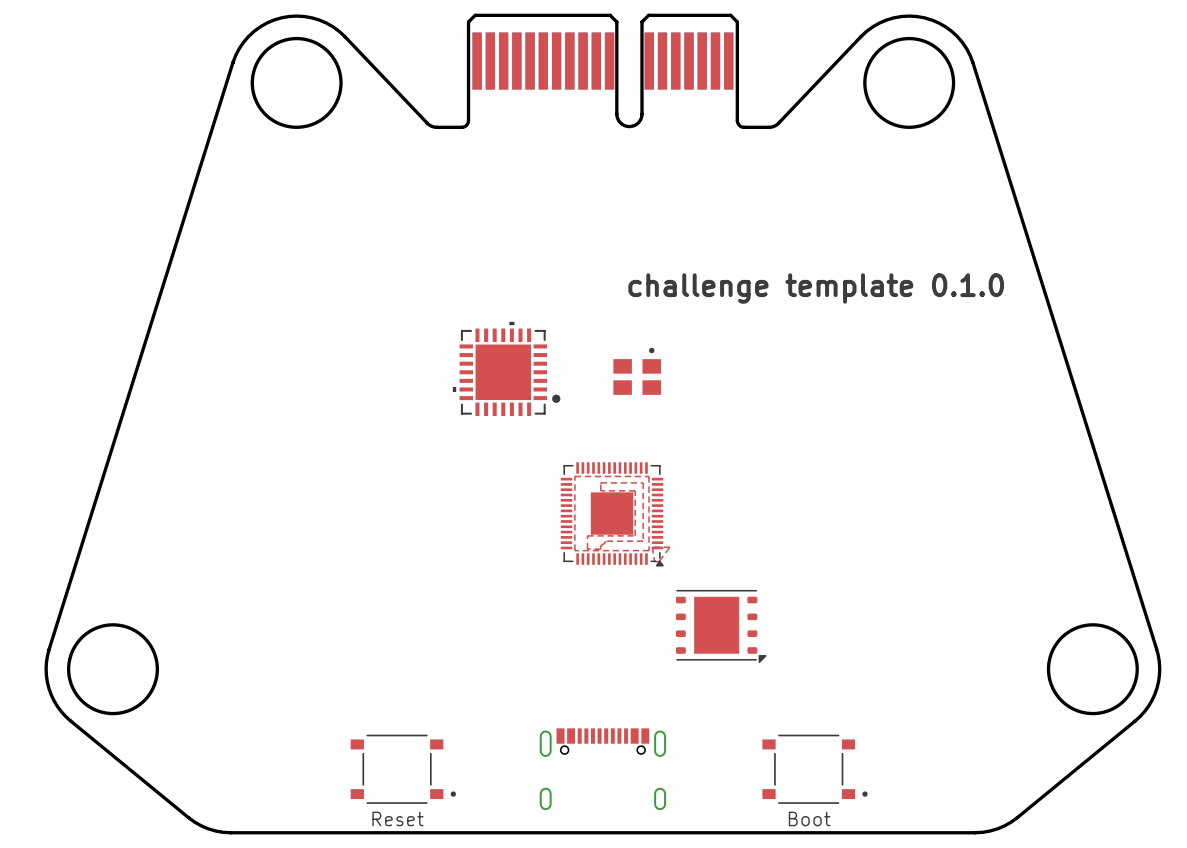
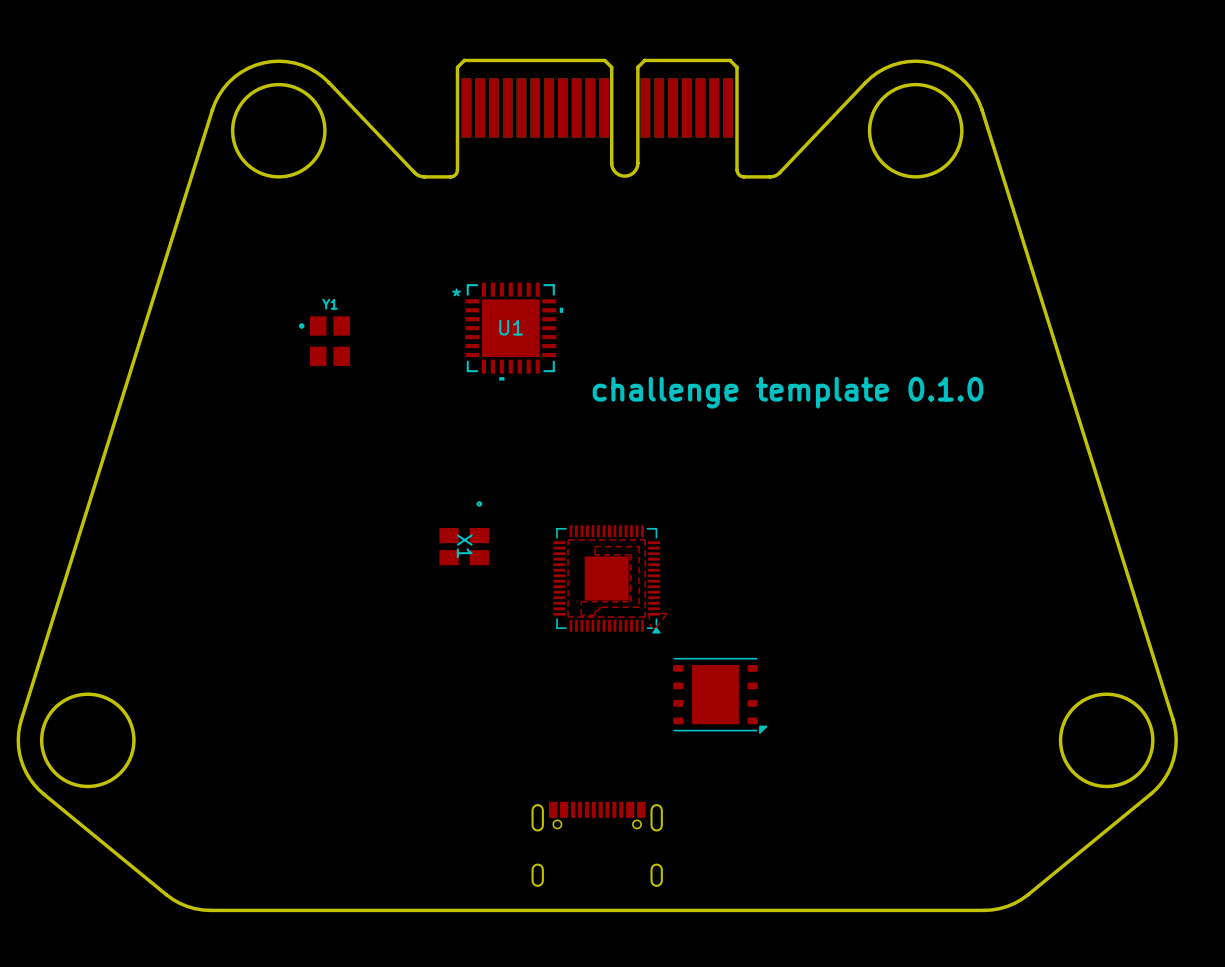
U1: none -> (514, 331)
Y1: none -> (324, 341)
text position: challenge template 0.1.0 (816, 288) -> challenge template 0.1.0 (788, 392)
part: (506, 368) -> none
part: (637, 371) -> none
X1: none -> (464, 533)
part: (403, 769) -> none
part: (815, 769) -> none
text: Reset (398, 818) -> none
text: Boot (809, 818) -> none

